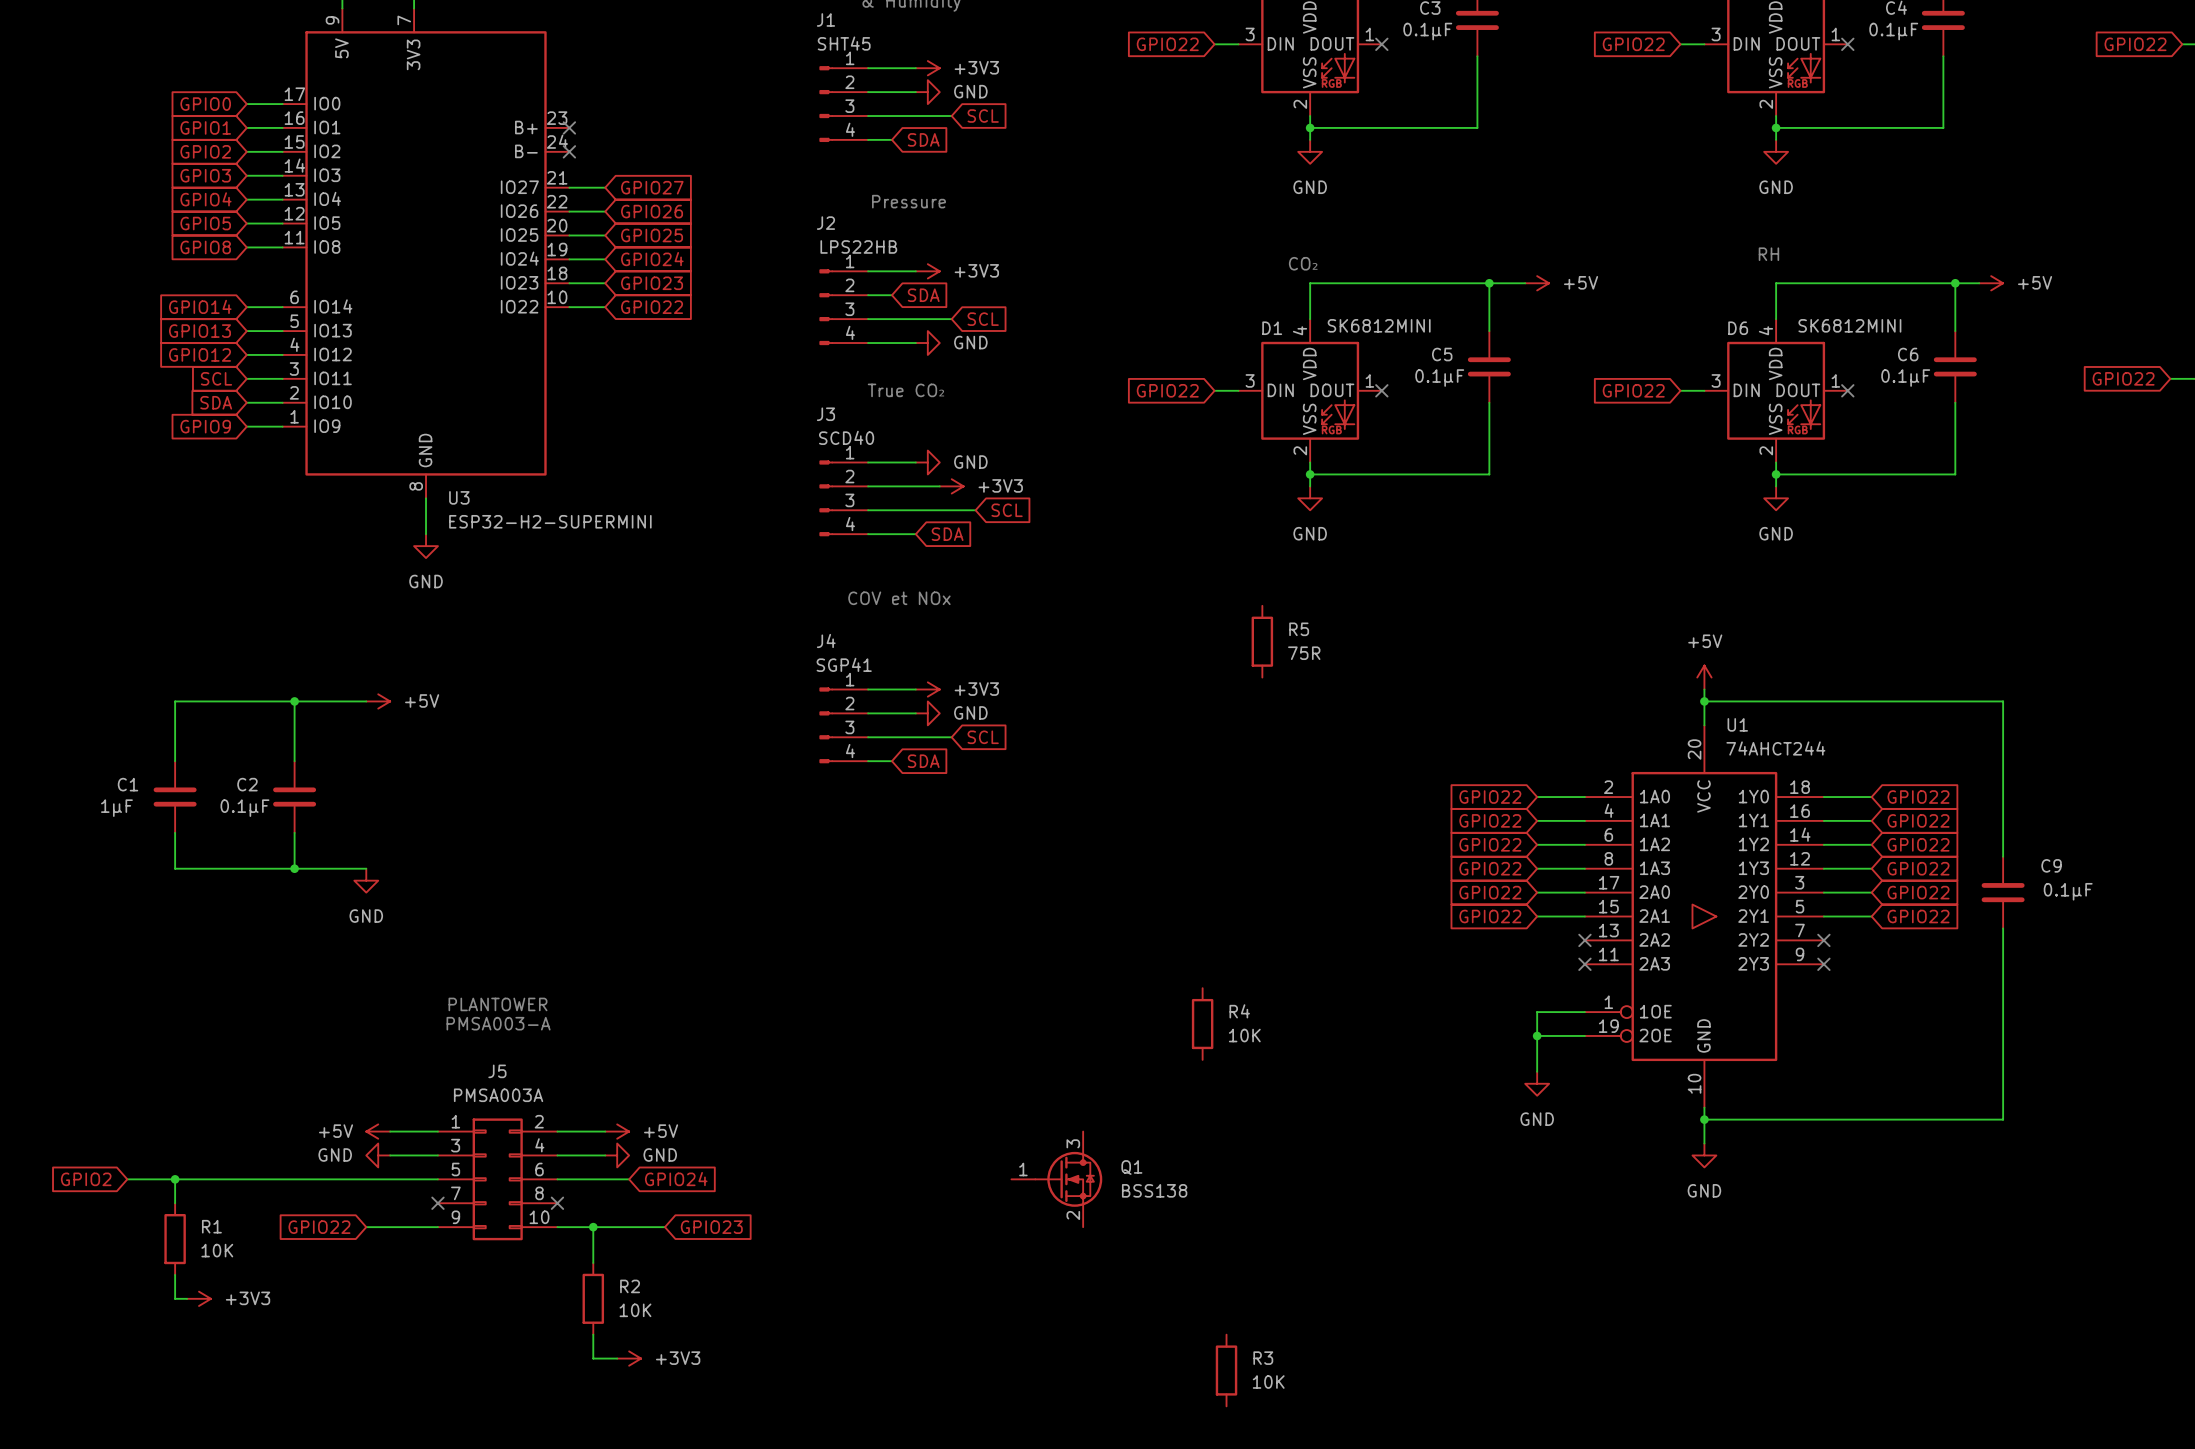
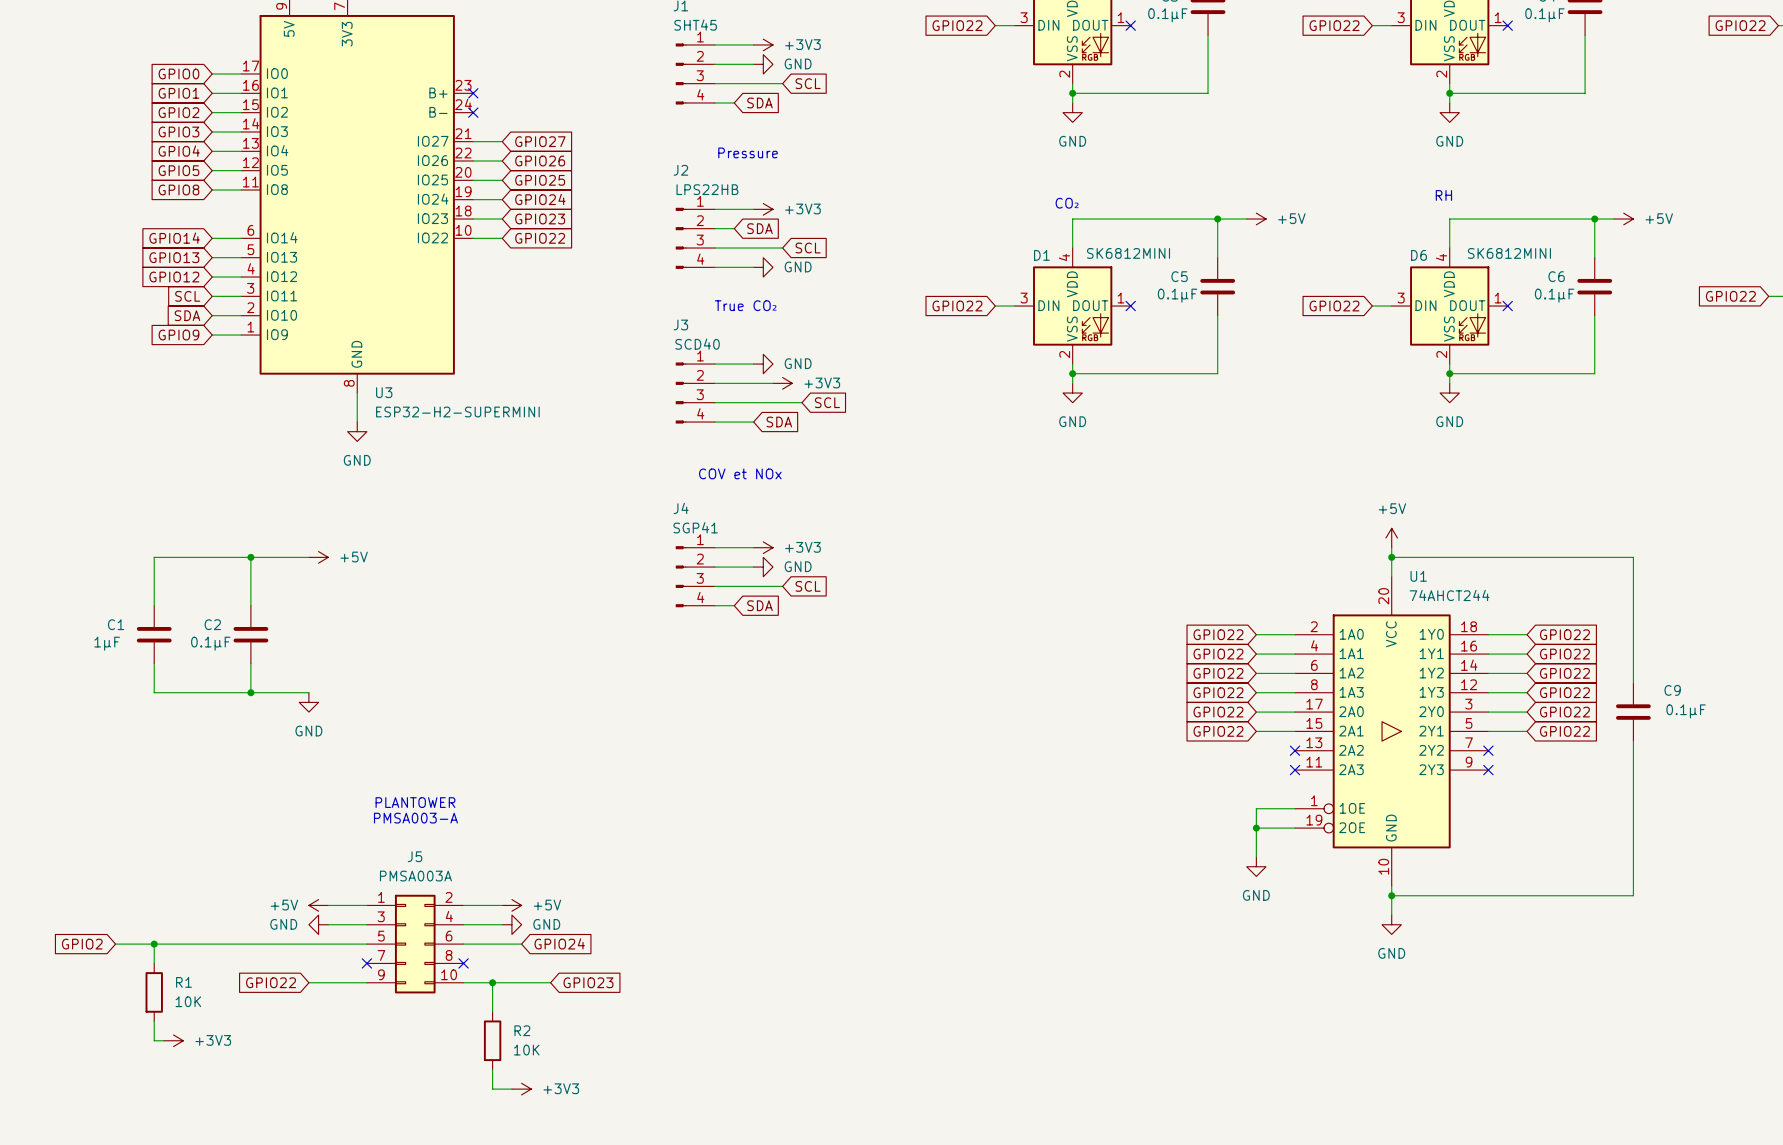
R5: 75R (1262, 641) -> none
R4: 10K (1202, 1024) -> none
Q1: BSS138 (1056, 1179) -> none
R3: 10K (1226, 1370) -> none

